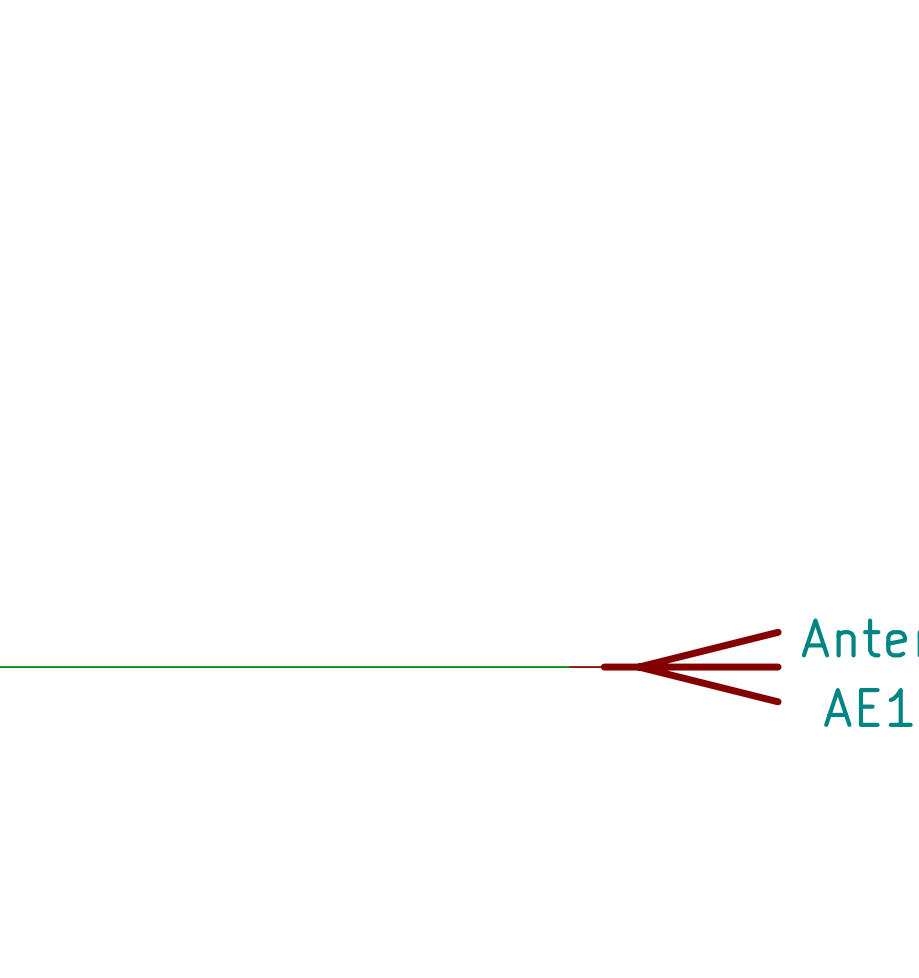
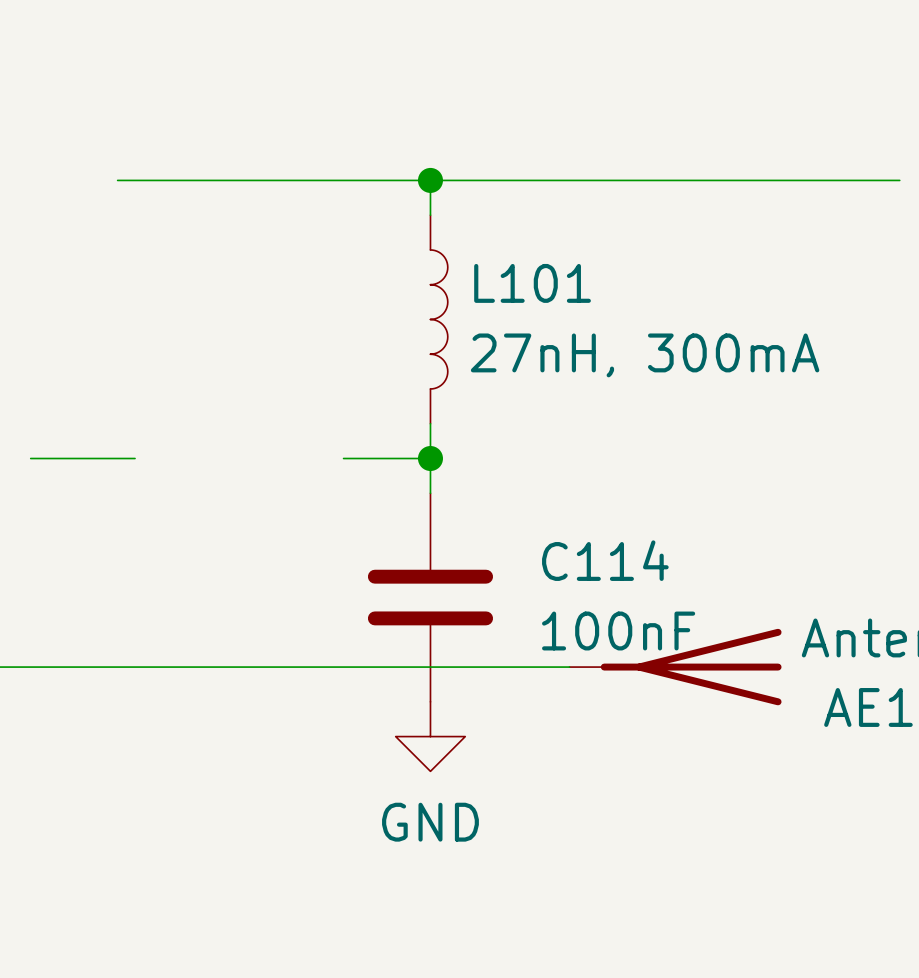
wire: none -> (117, 180) (899, 180)
wire: none -> (430, 180) (430, 215)
junction: none -> (430, 180)
L101: none -> 27nH, 300mA (439, 319)
wire: none -> (430, 423) (430, 493)
wire: none -> (30, 458) (135, 458)
wire: none -> (343, 458) (430, 458)
junction: none -> (430, 458)
C114: none -> 100nF (430, 597)
power symbol: none -> GND (430, 736)

